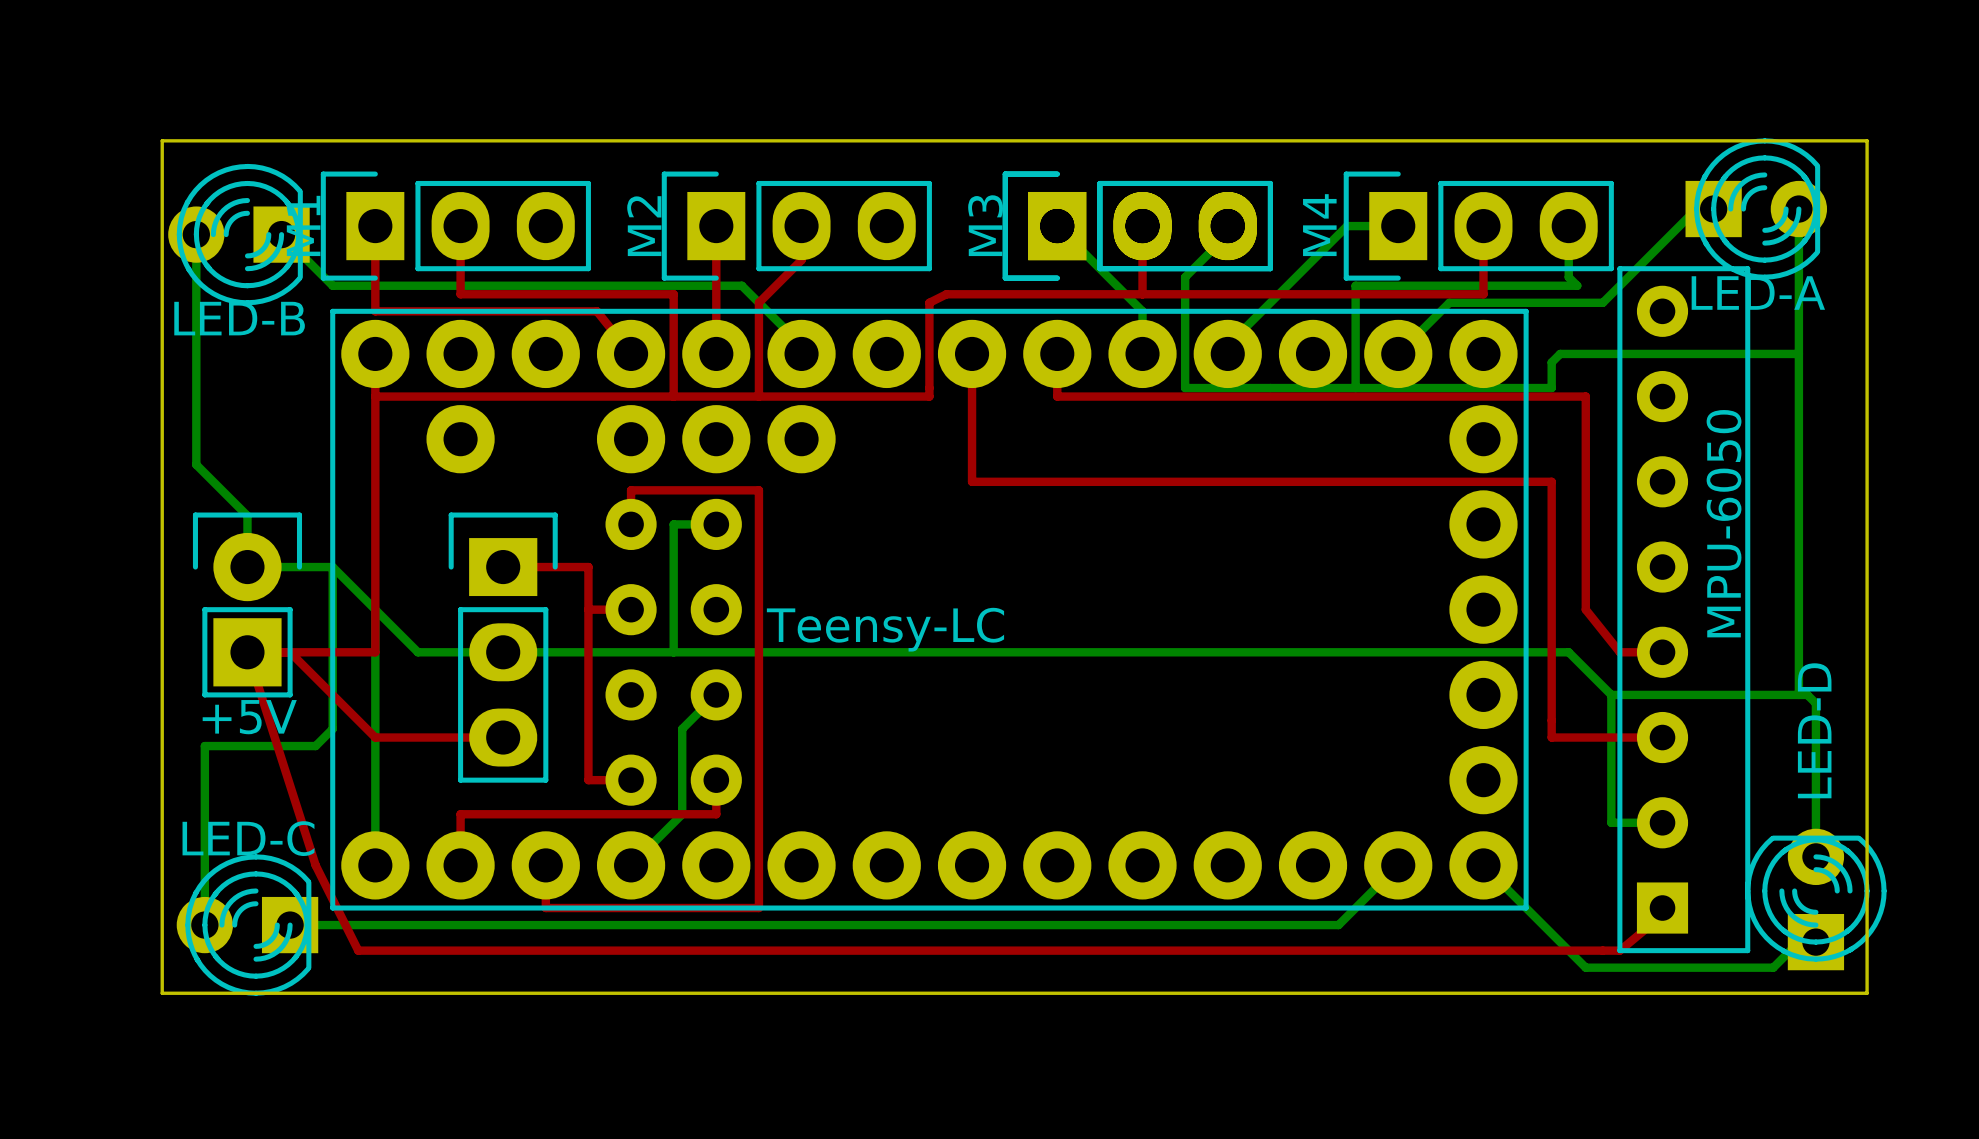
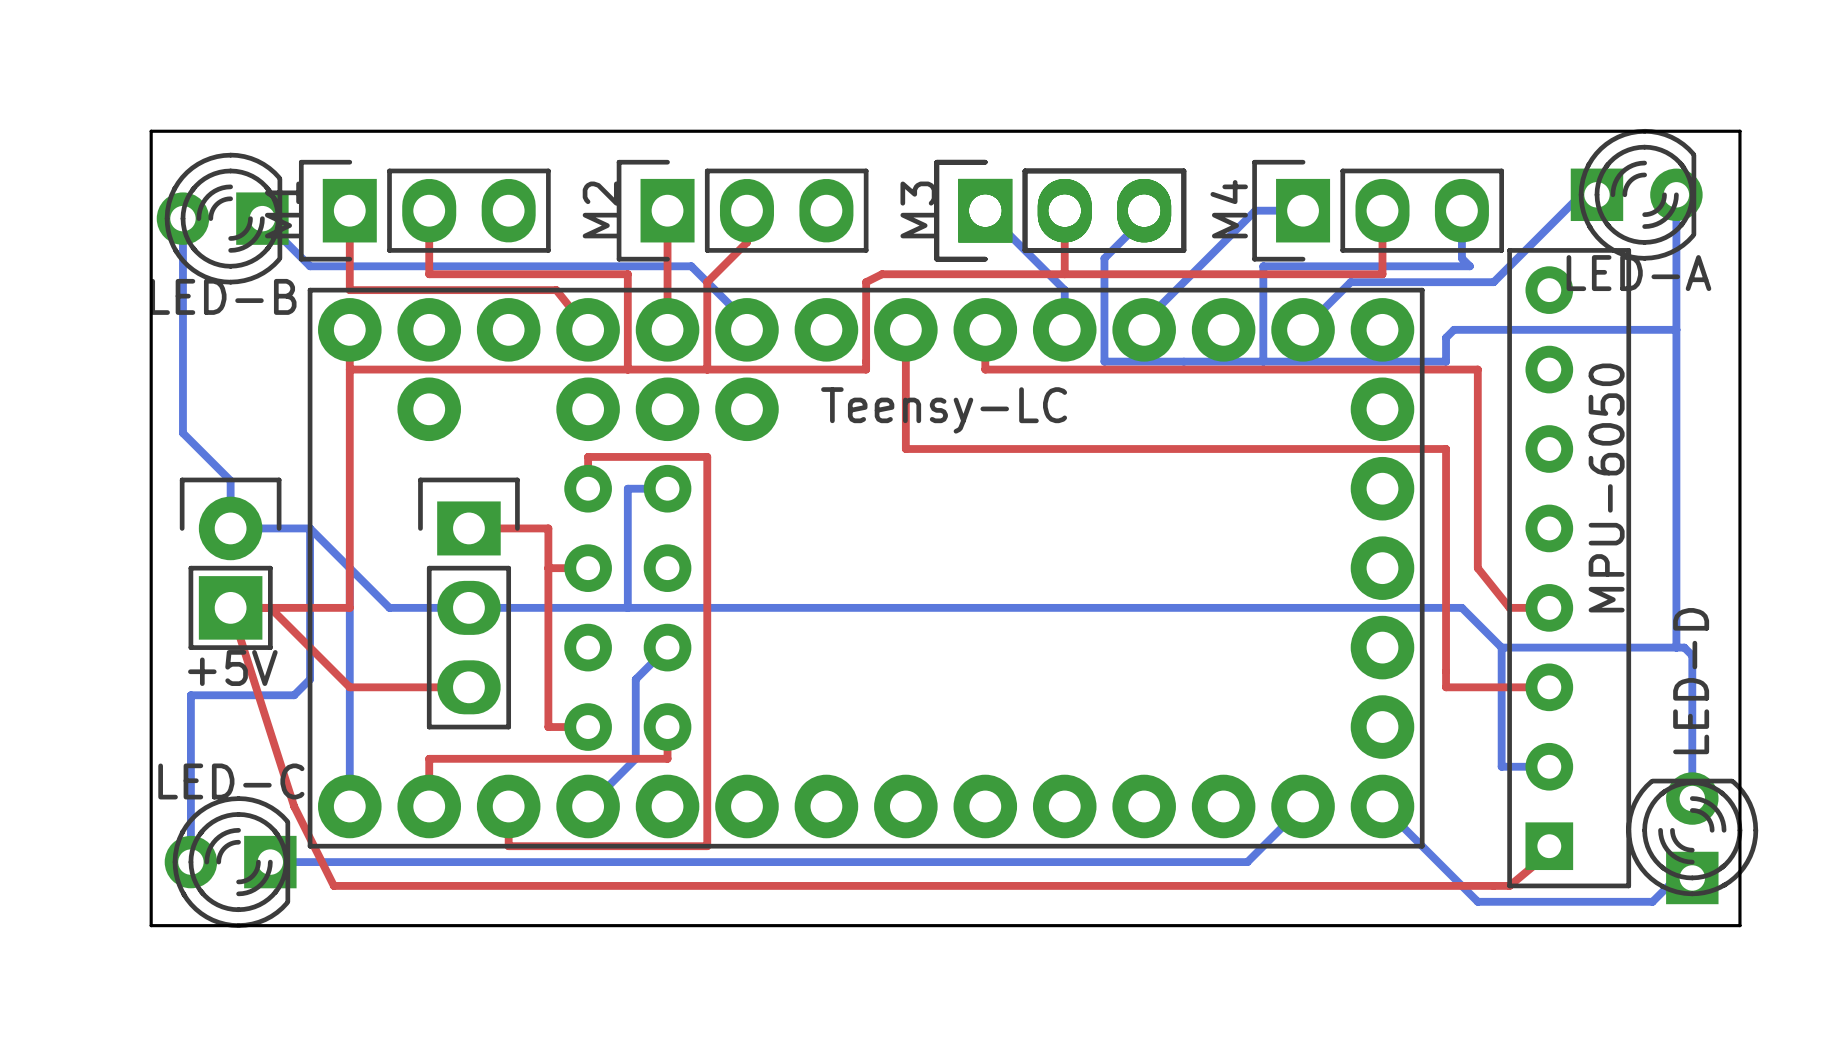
Teensy-LC value: none -> Teensy-LC (944, 410)
Teensy-LC name: Teensy-LC (885, 629) -> none

